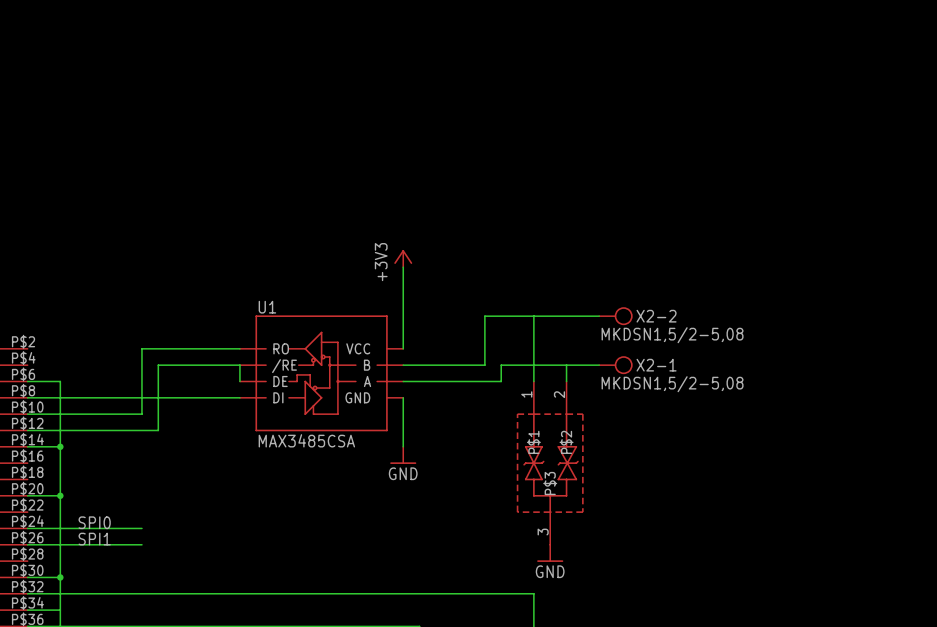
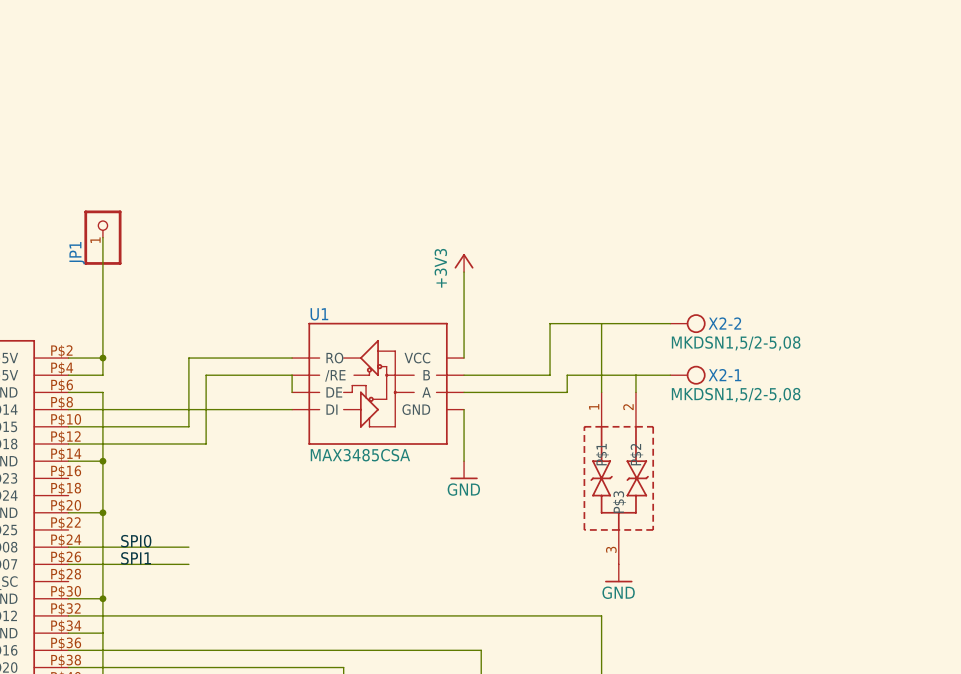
wire: none -> (102, 237) (102, 375) (68, 375)
JP1: none -> (102, 237)
wire: none -> (68, 358) (102, 358)
junction: none -> (102, 358)

